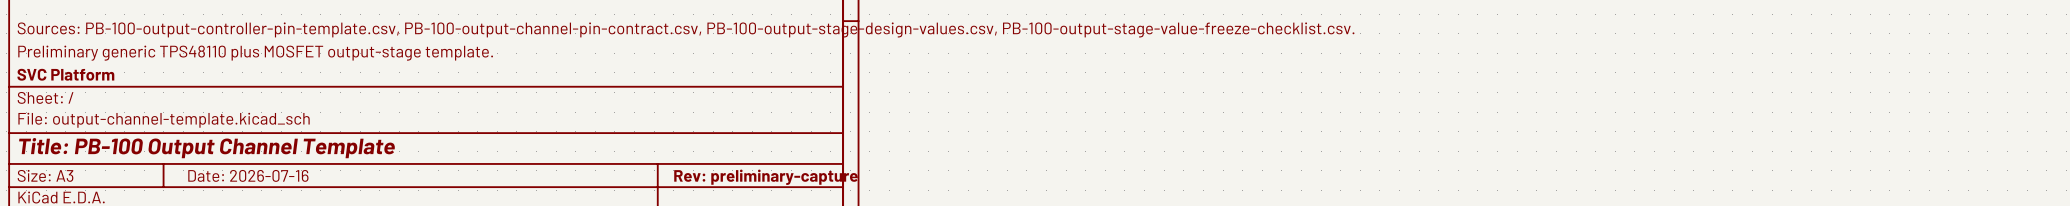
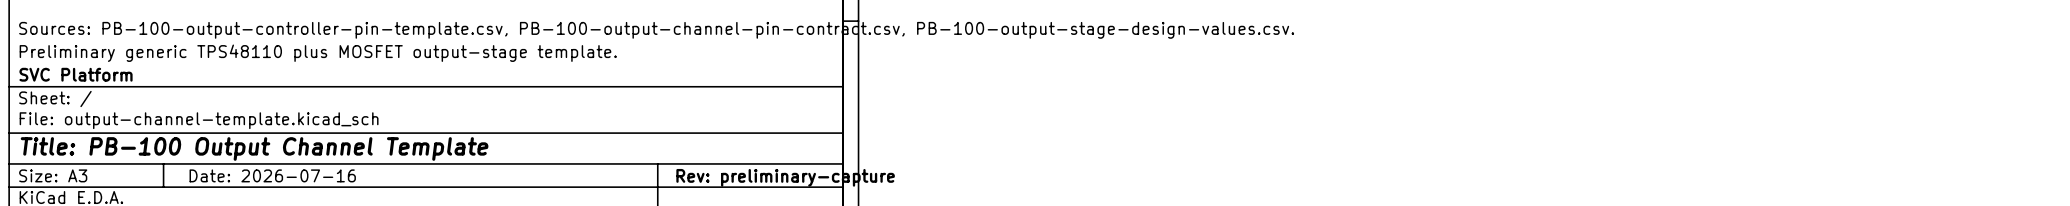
title block: Sources: PB-100-output-controller-pin-template.csv, PB-100-output-channel-pin-contract.csv, PB-100-output-stage-design-values.csv, PB-100-output-stage-value-freeze-checklist.csv. (686, 29) -> Sources: PB-100-output-controller-pin-template.csv, PB-100-output-channel-pin-contract.csv, PB-100-output-stage-design-values.csv. (656, 30)

